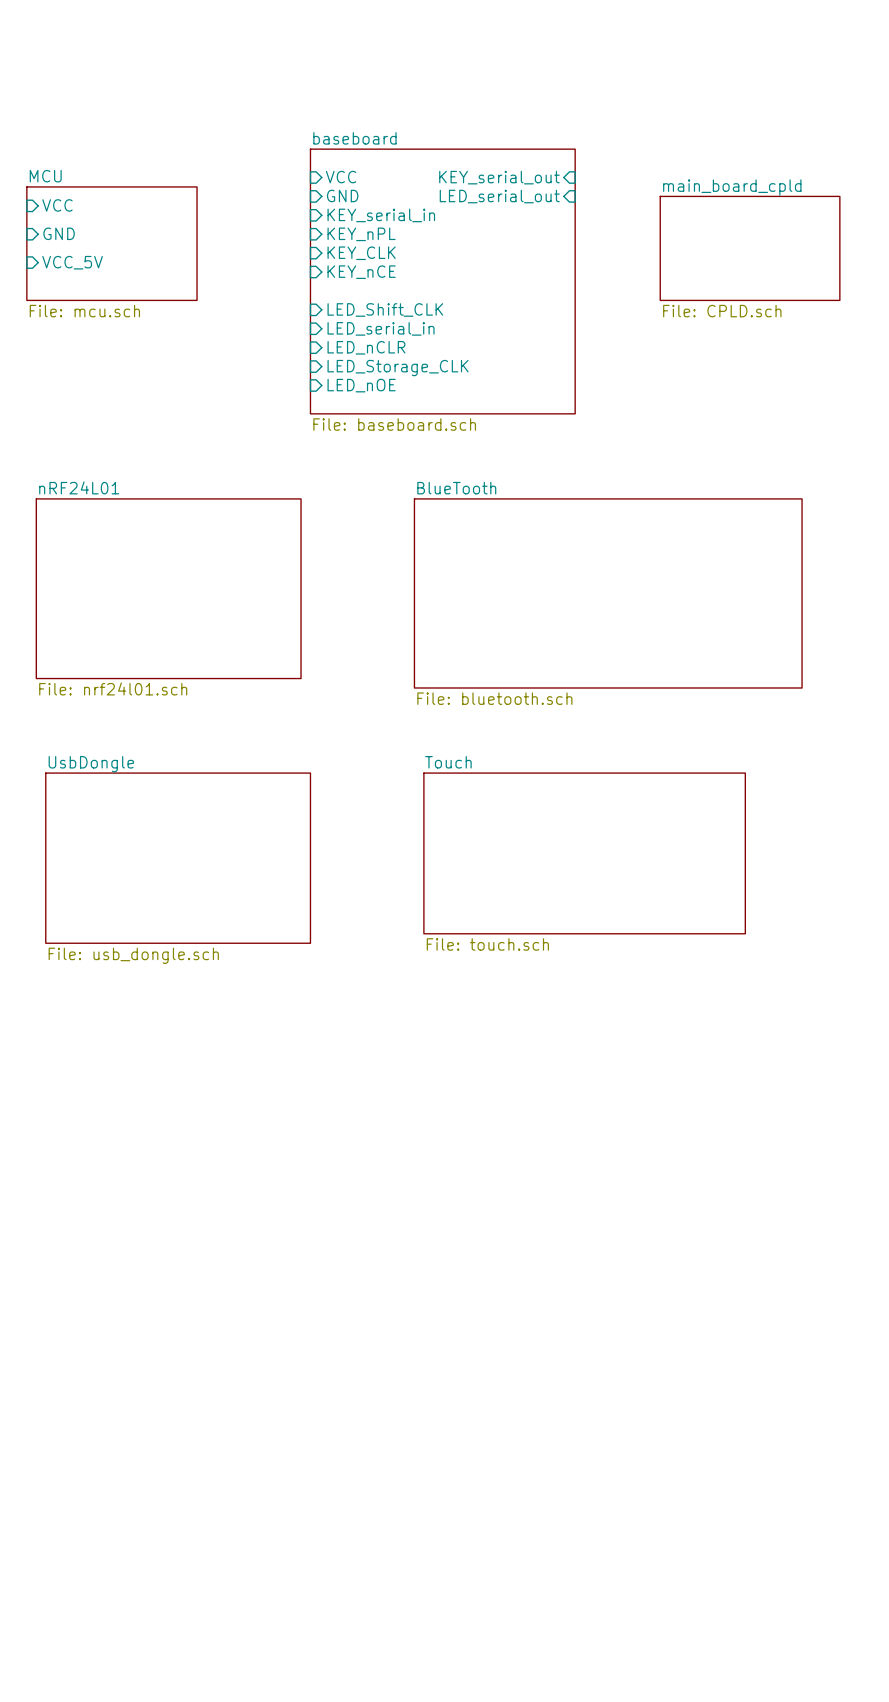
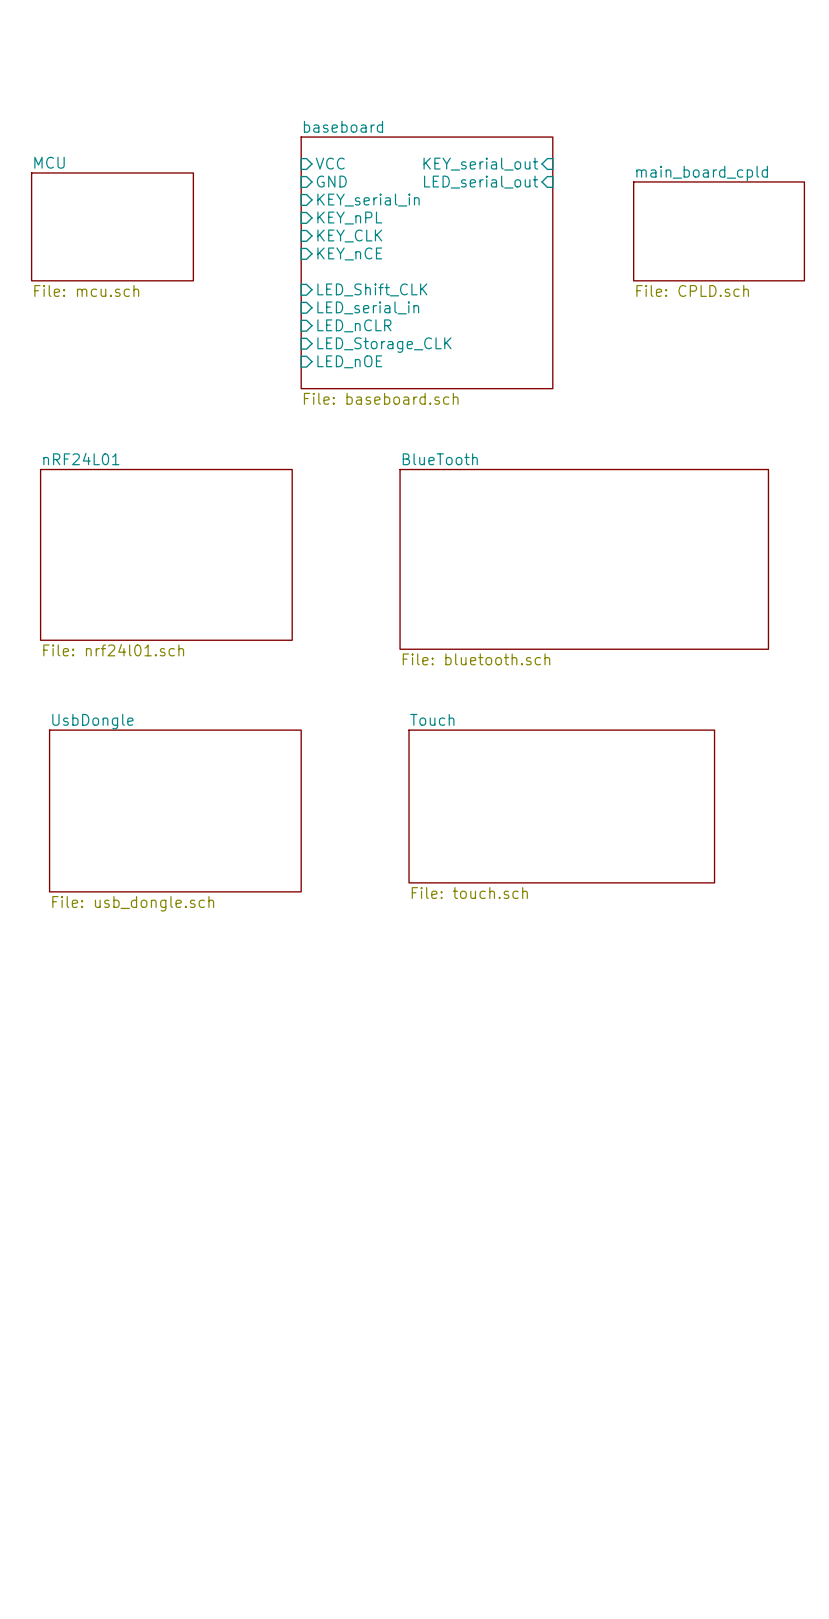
sheet pin: VCC (57, 205) -> none
sheet pin: GND (59, 233) -> none
sheet pin: VCC_5V (72, 262) -> none

